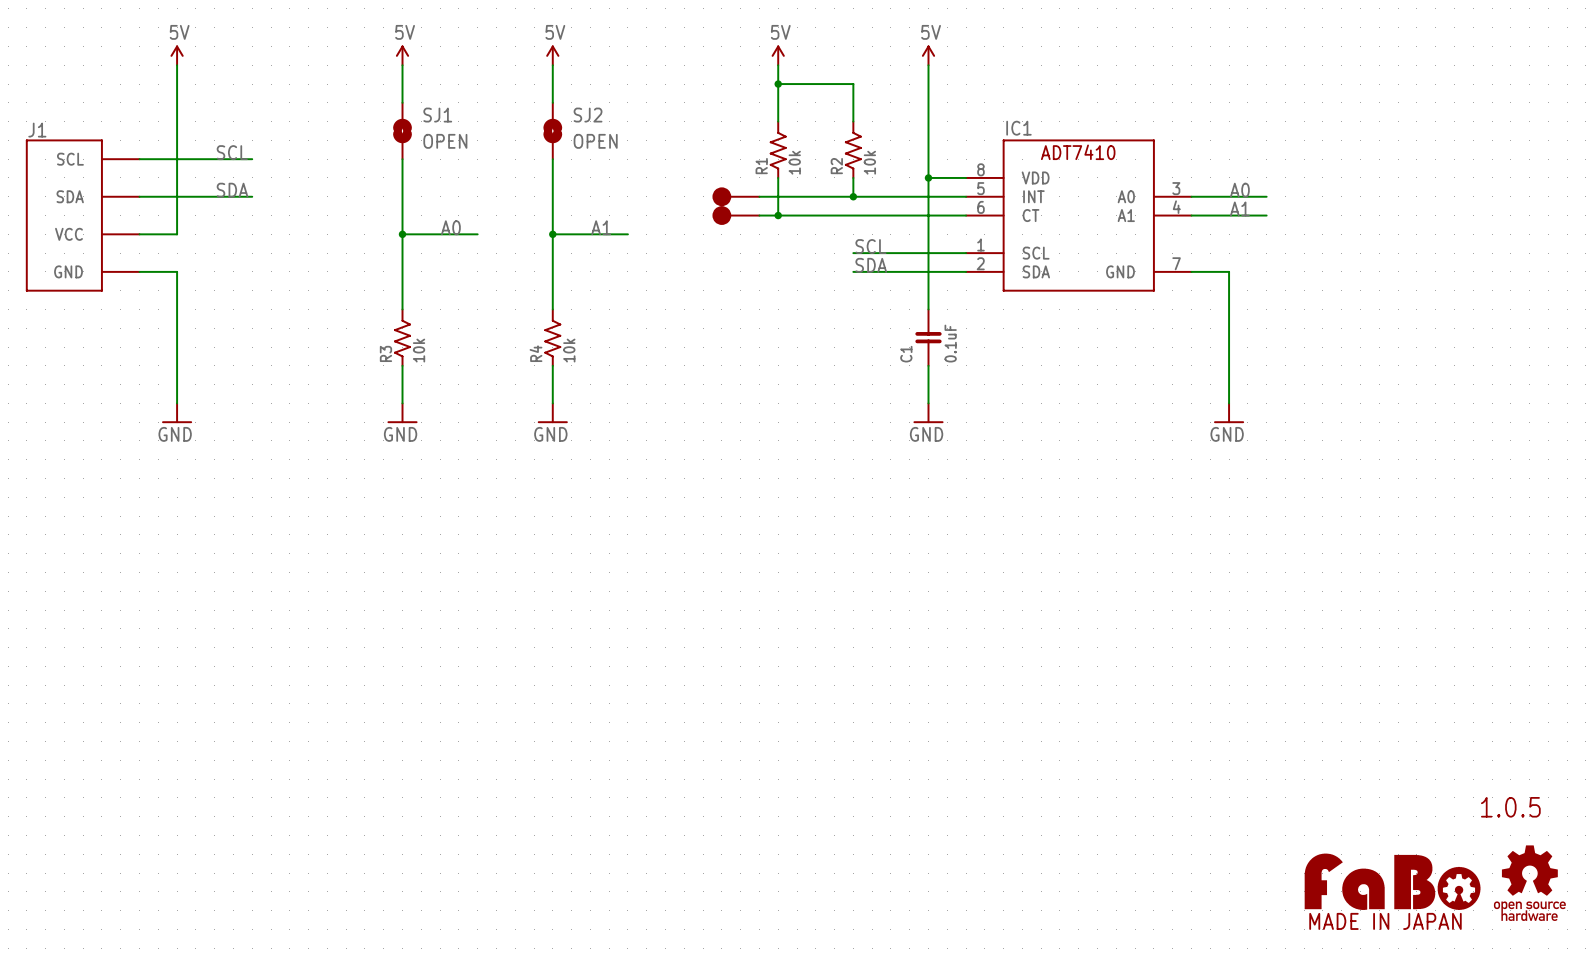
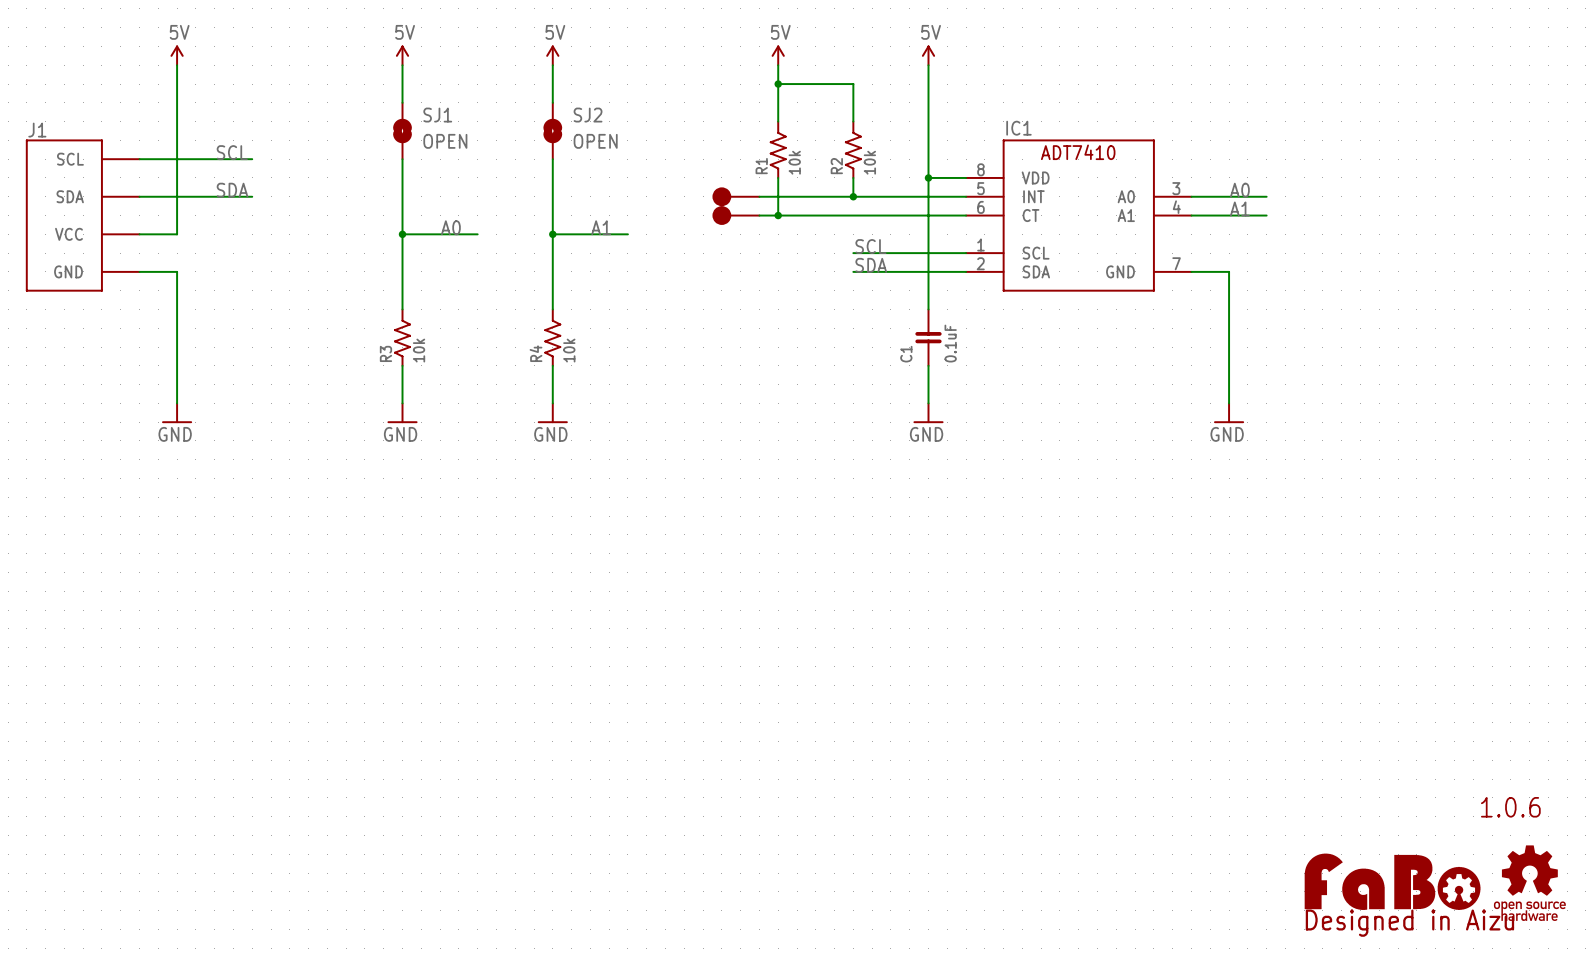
text: 1.0.5 (1510, 807) -> 1.0.6 (1510, 807)
part text: MADE IN JAPAN (1385, 921) -> none
part text: none -> Designed in Aizu (1409, 923)

